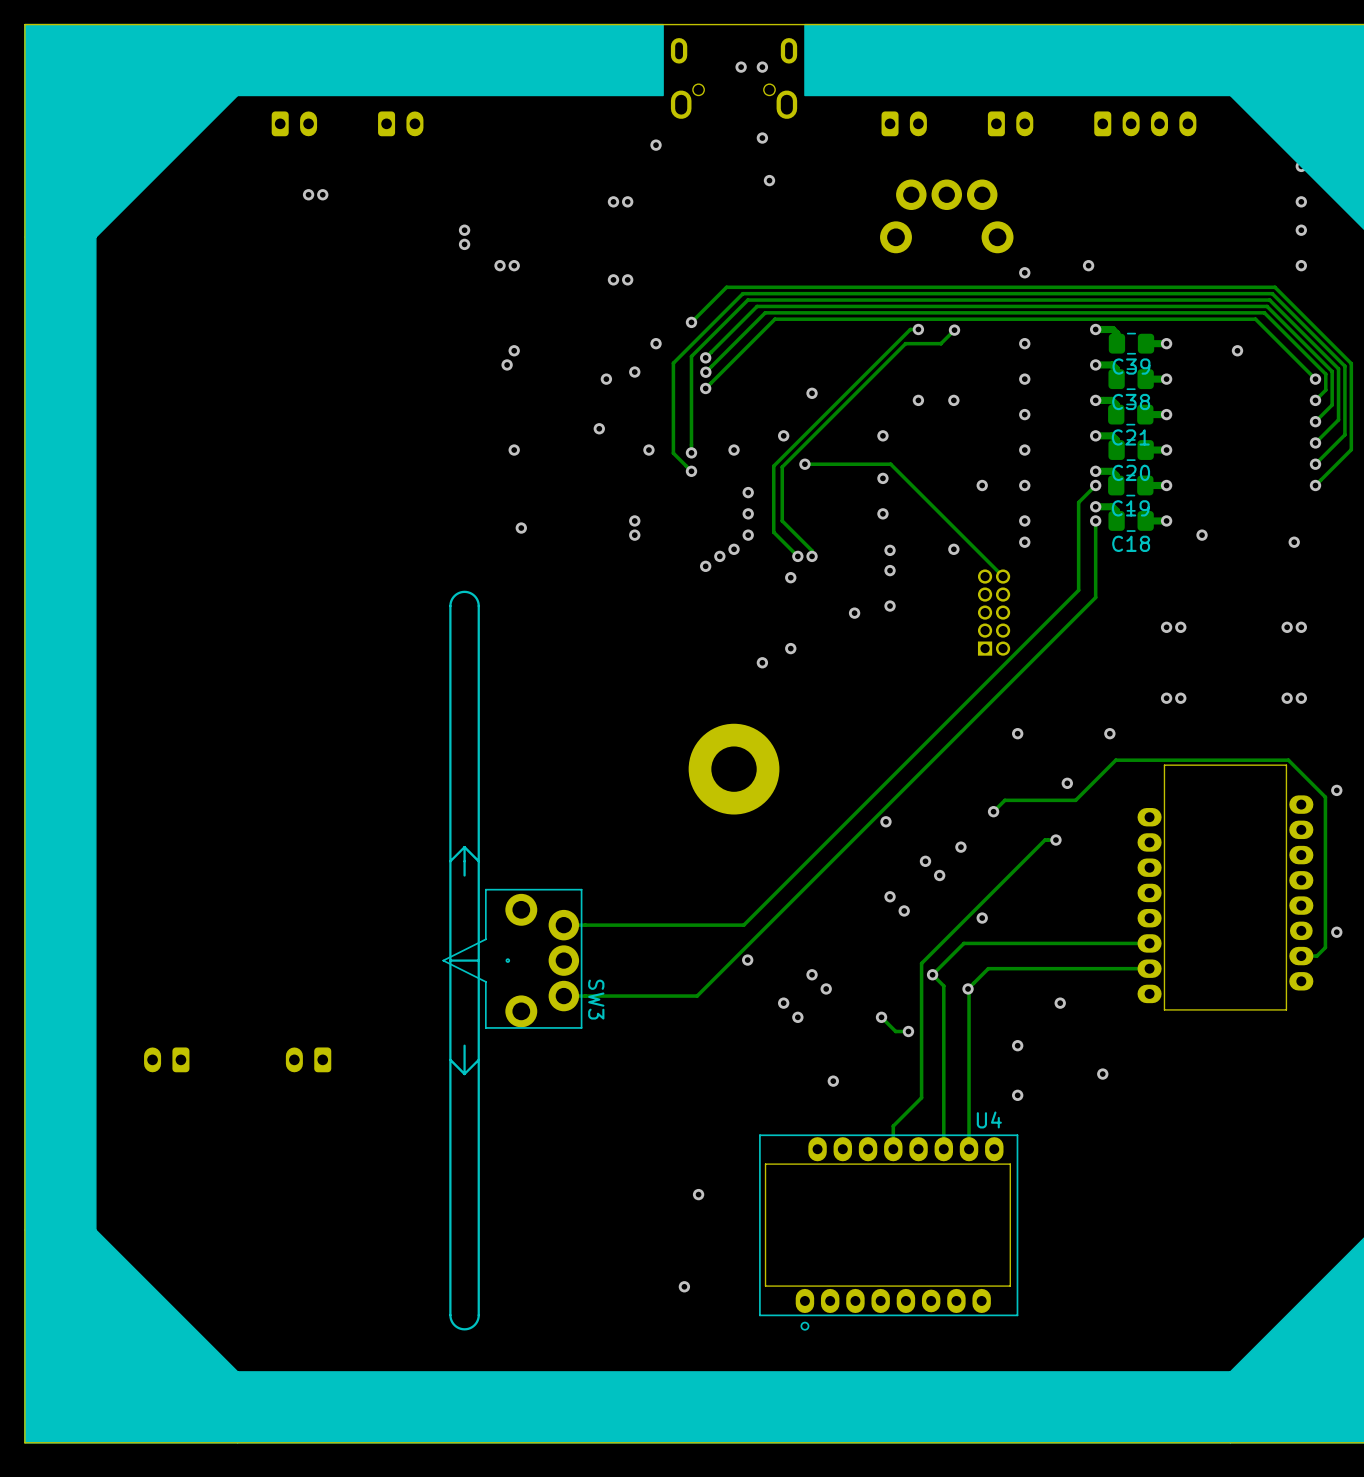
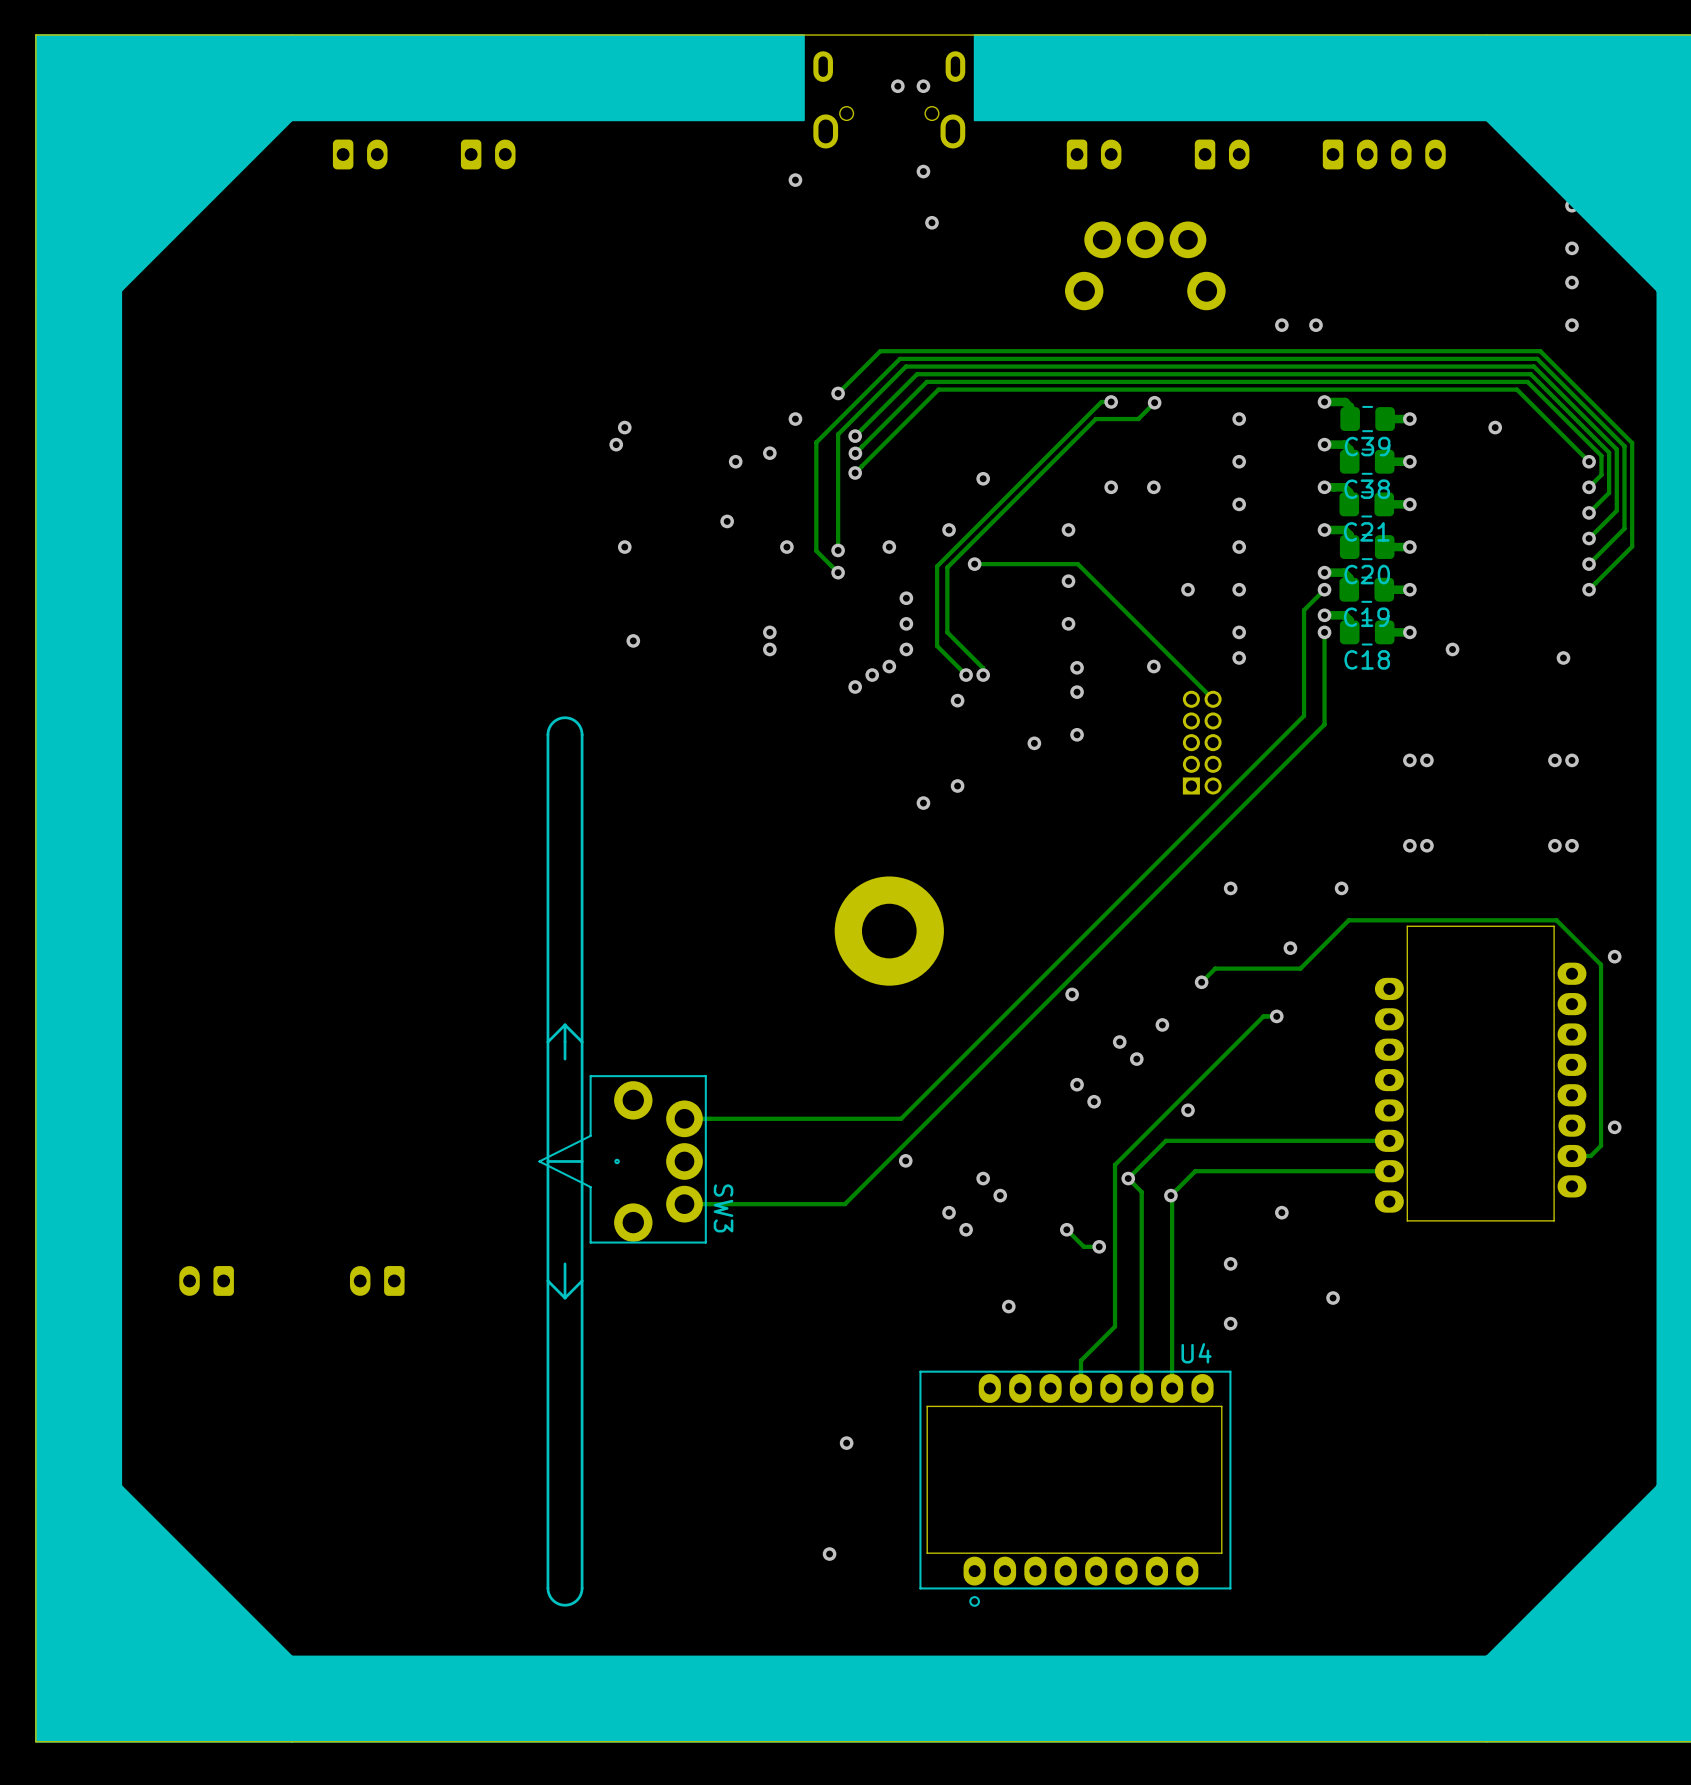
via: (308, 194) -> none
via: (322, 194) -> none
via: (613, 201) -> none
via: (627, 201) -> none
via: (464, 230) -> none
via: (464, 244) -> none
via: (500, 265) -> none
via: (514, 265) -> none
via position: (1024, 272) -> (1281, 325)
via: (613, 279) -> none
via: (627, 279) -> none

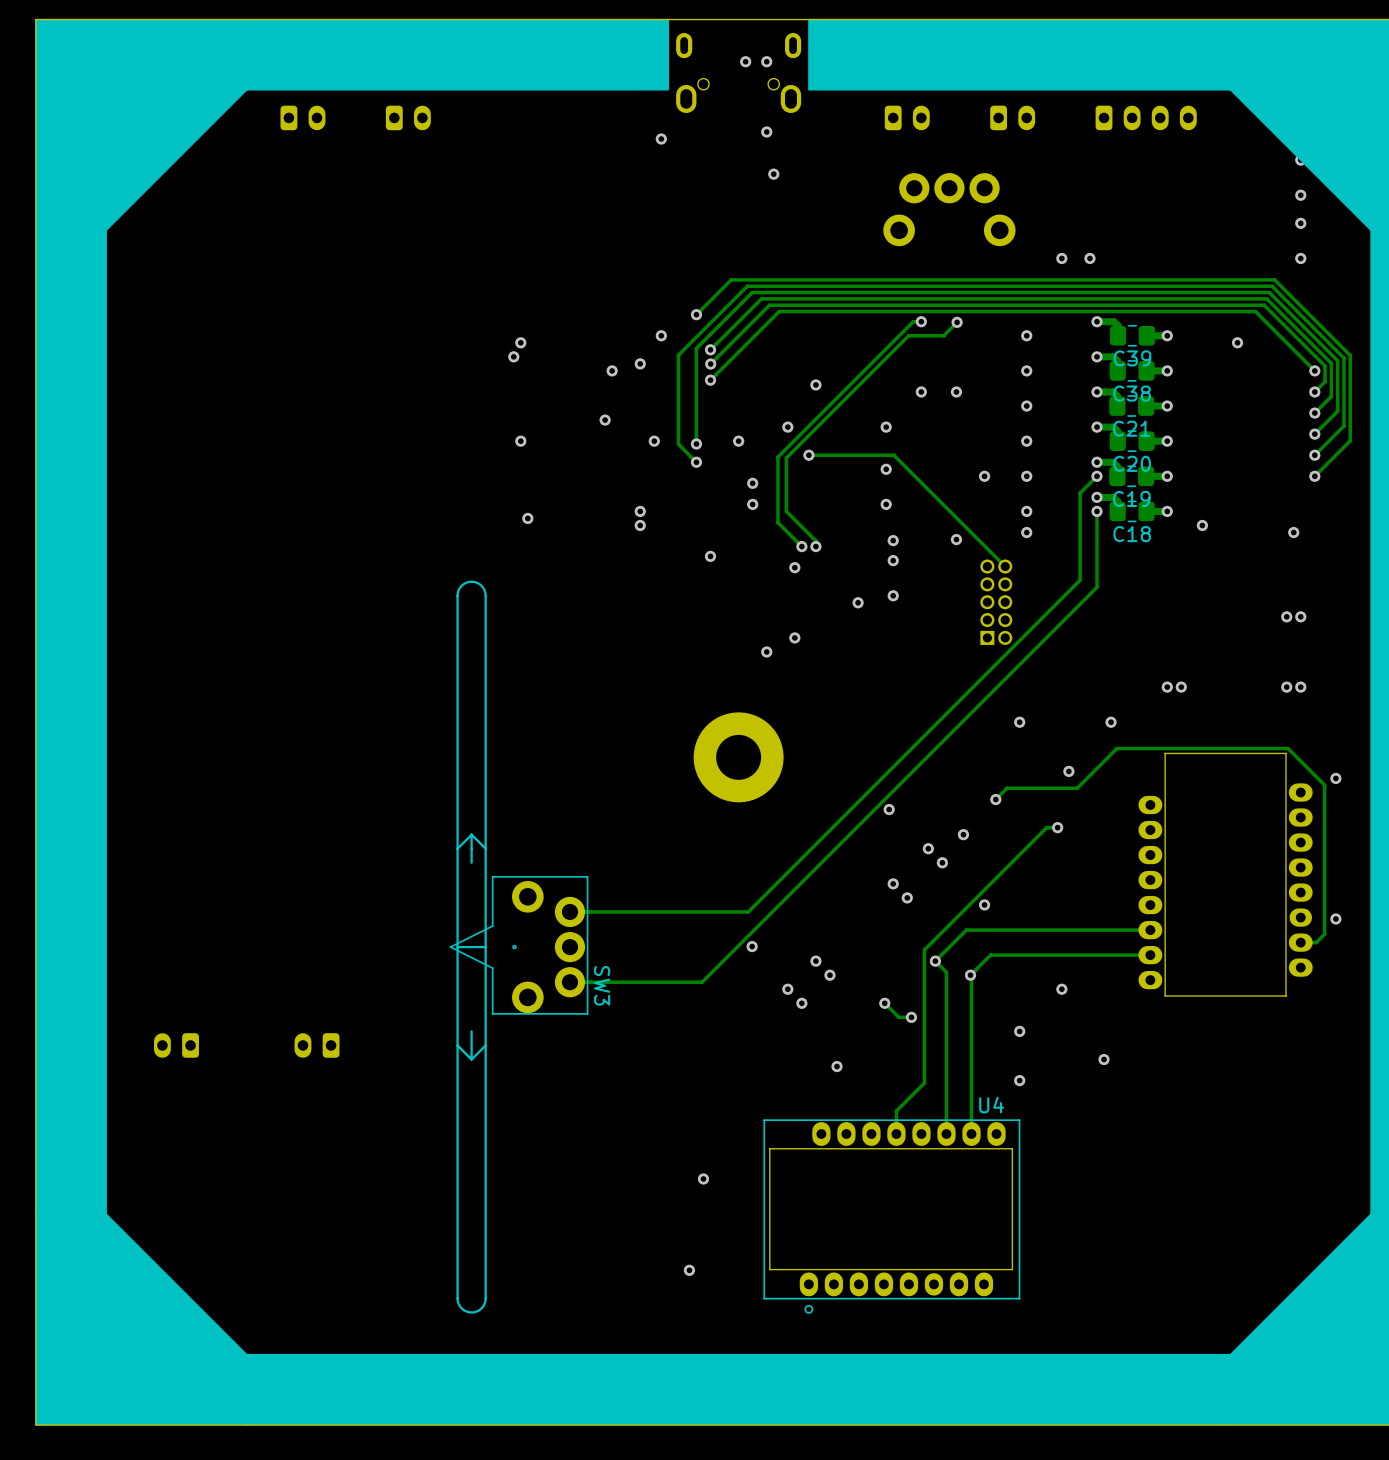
via: (906, 649) -> none
via: (889, 666) -> none
via: (872, 675) -> none
via: (1409, 760) -> none
via: (1426, 760) -> none

